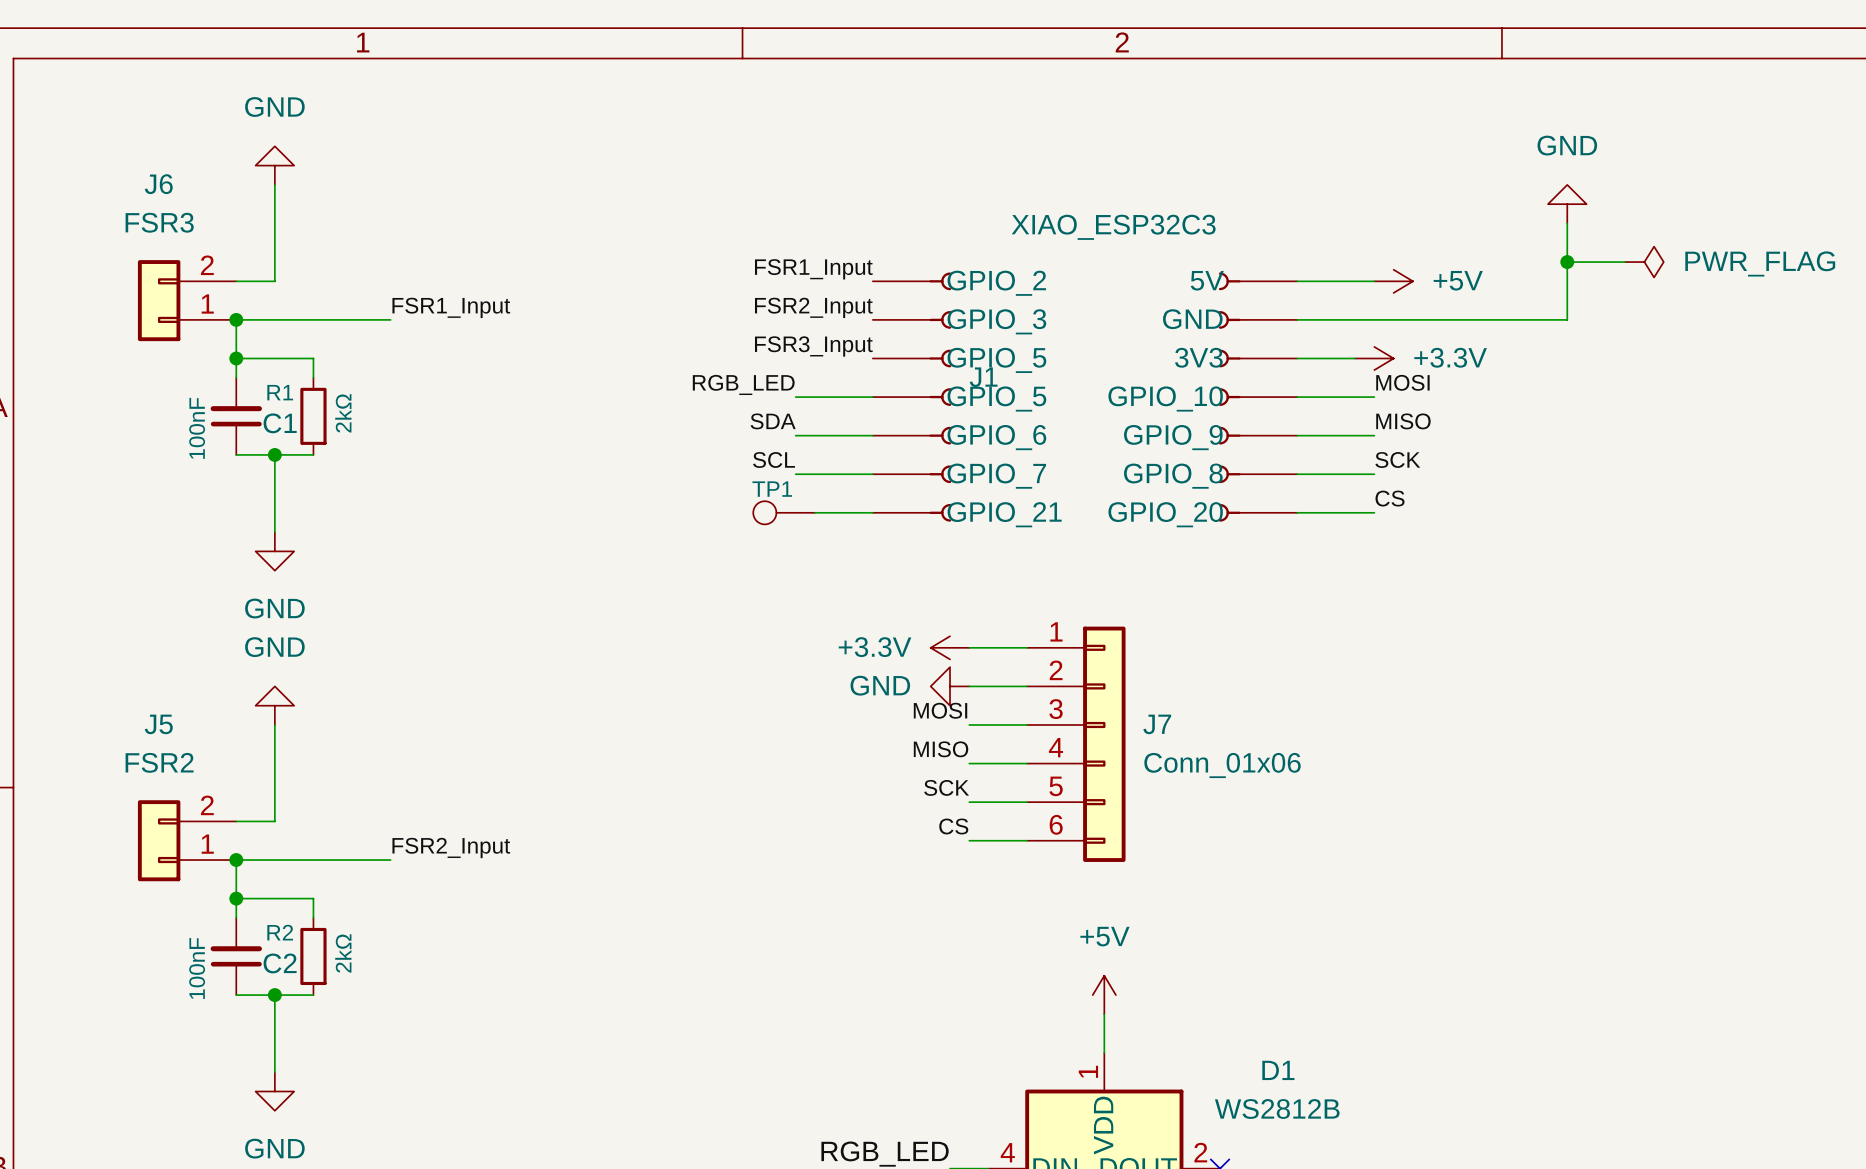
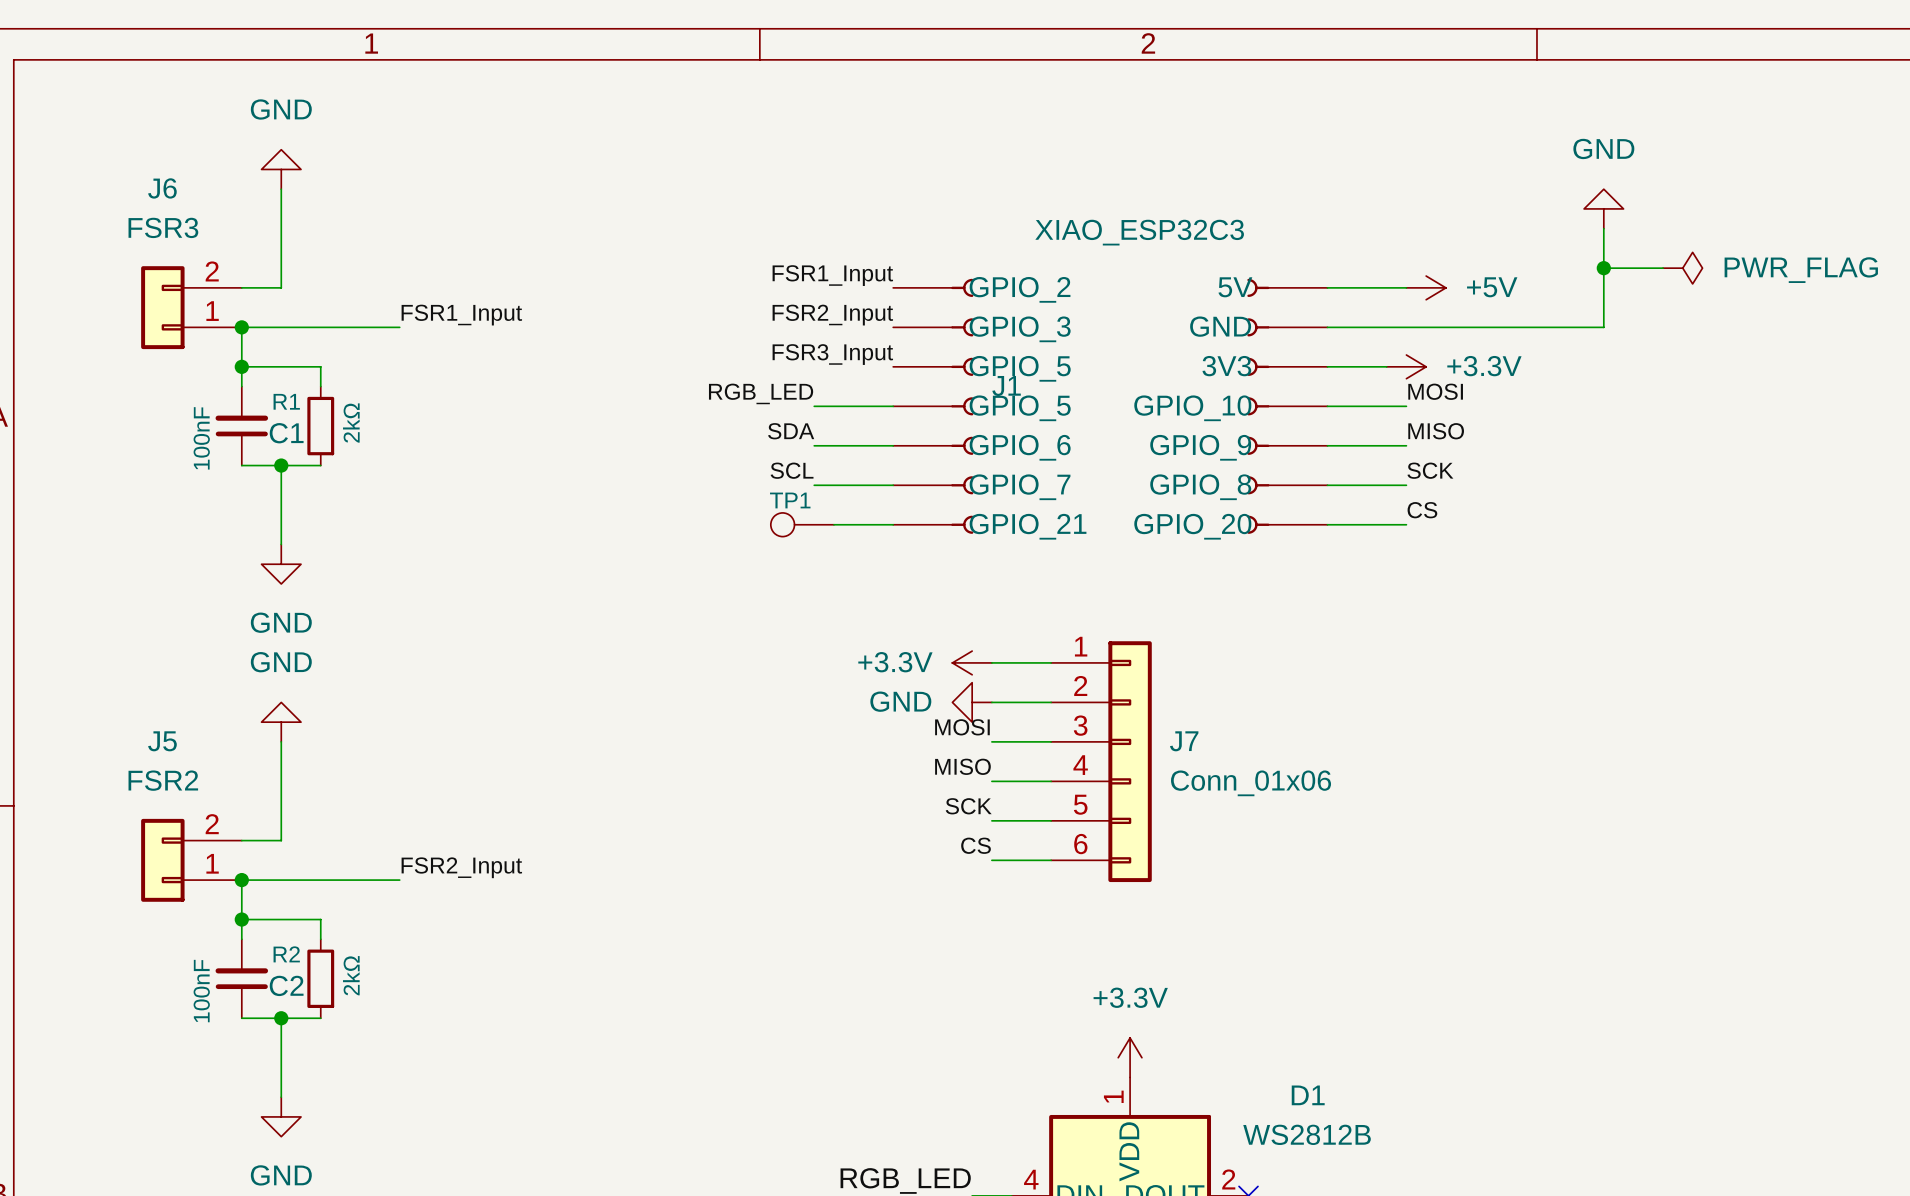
power symbol: +5V (1104, 995) -> none
power symbol: none -> +3.3V (1130, 1057)

